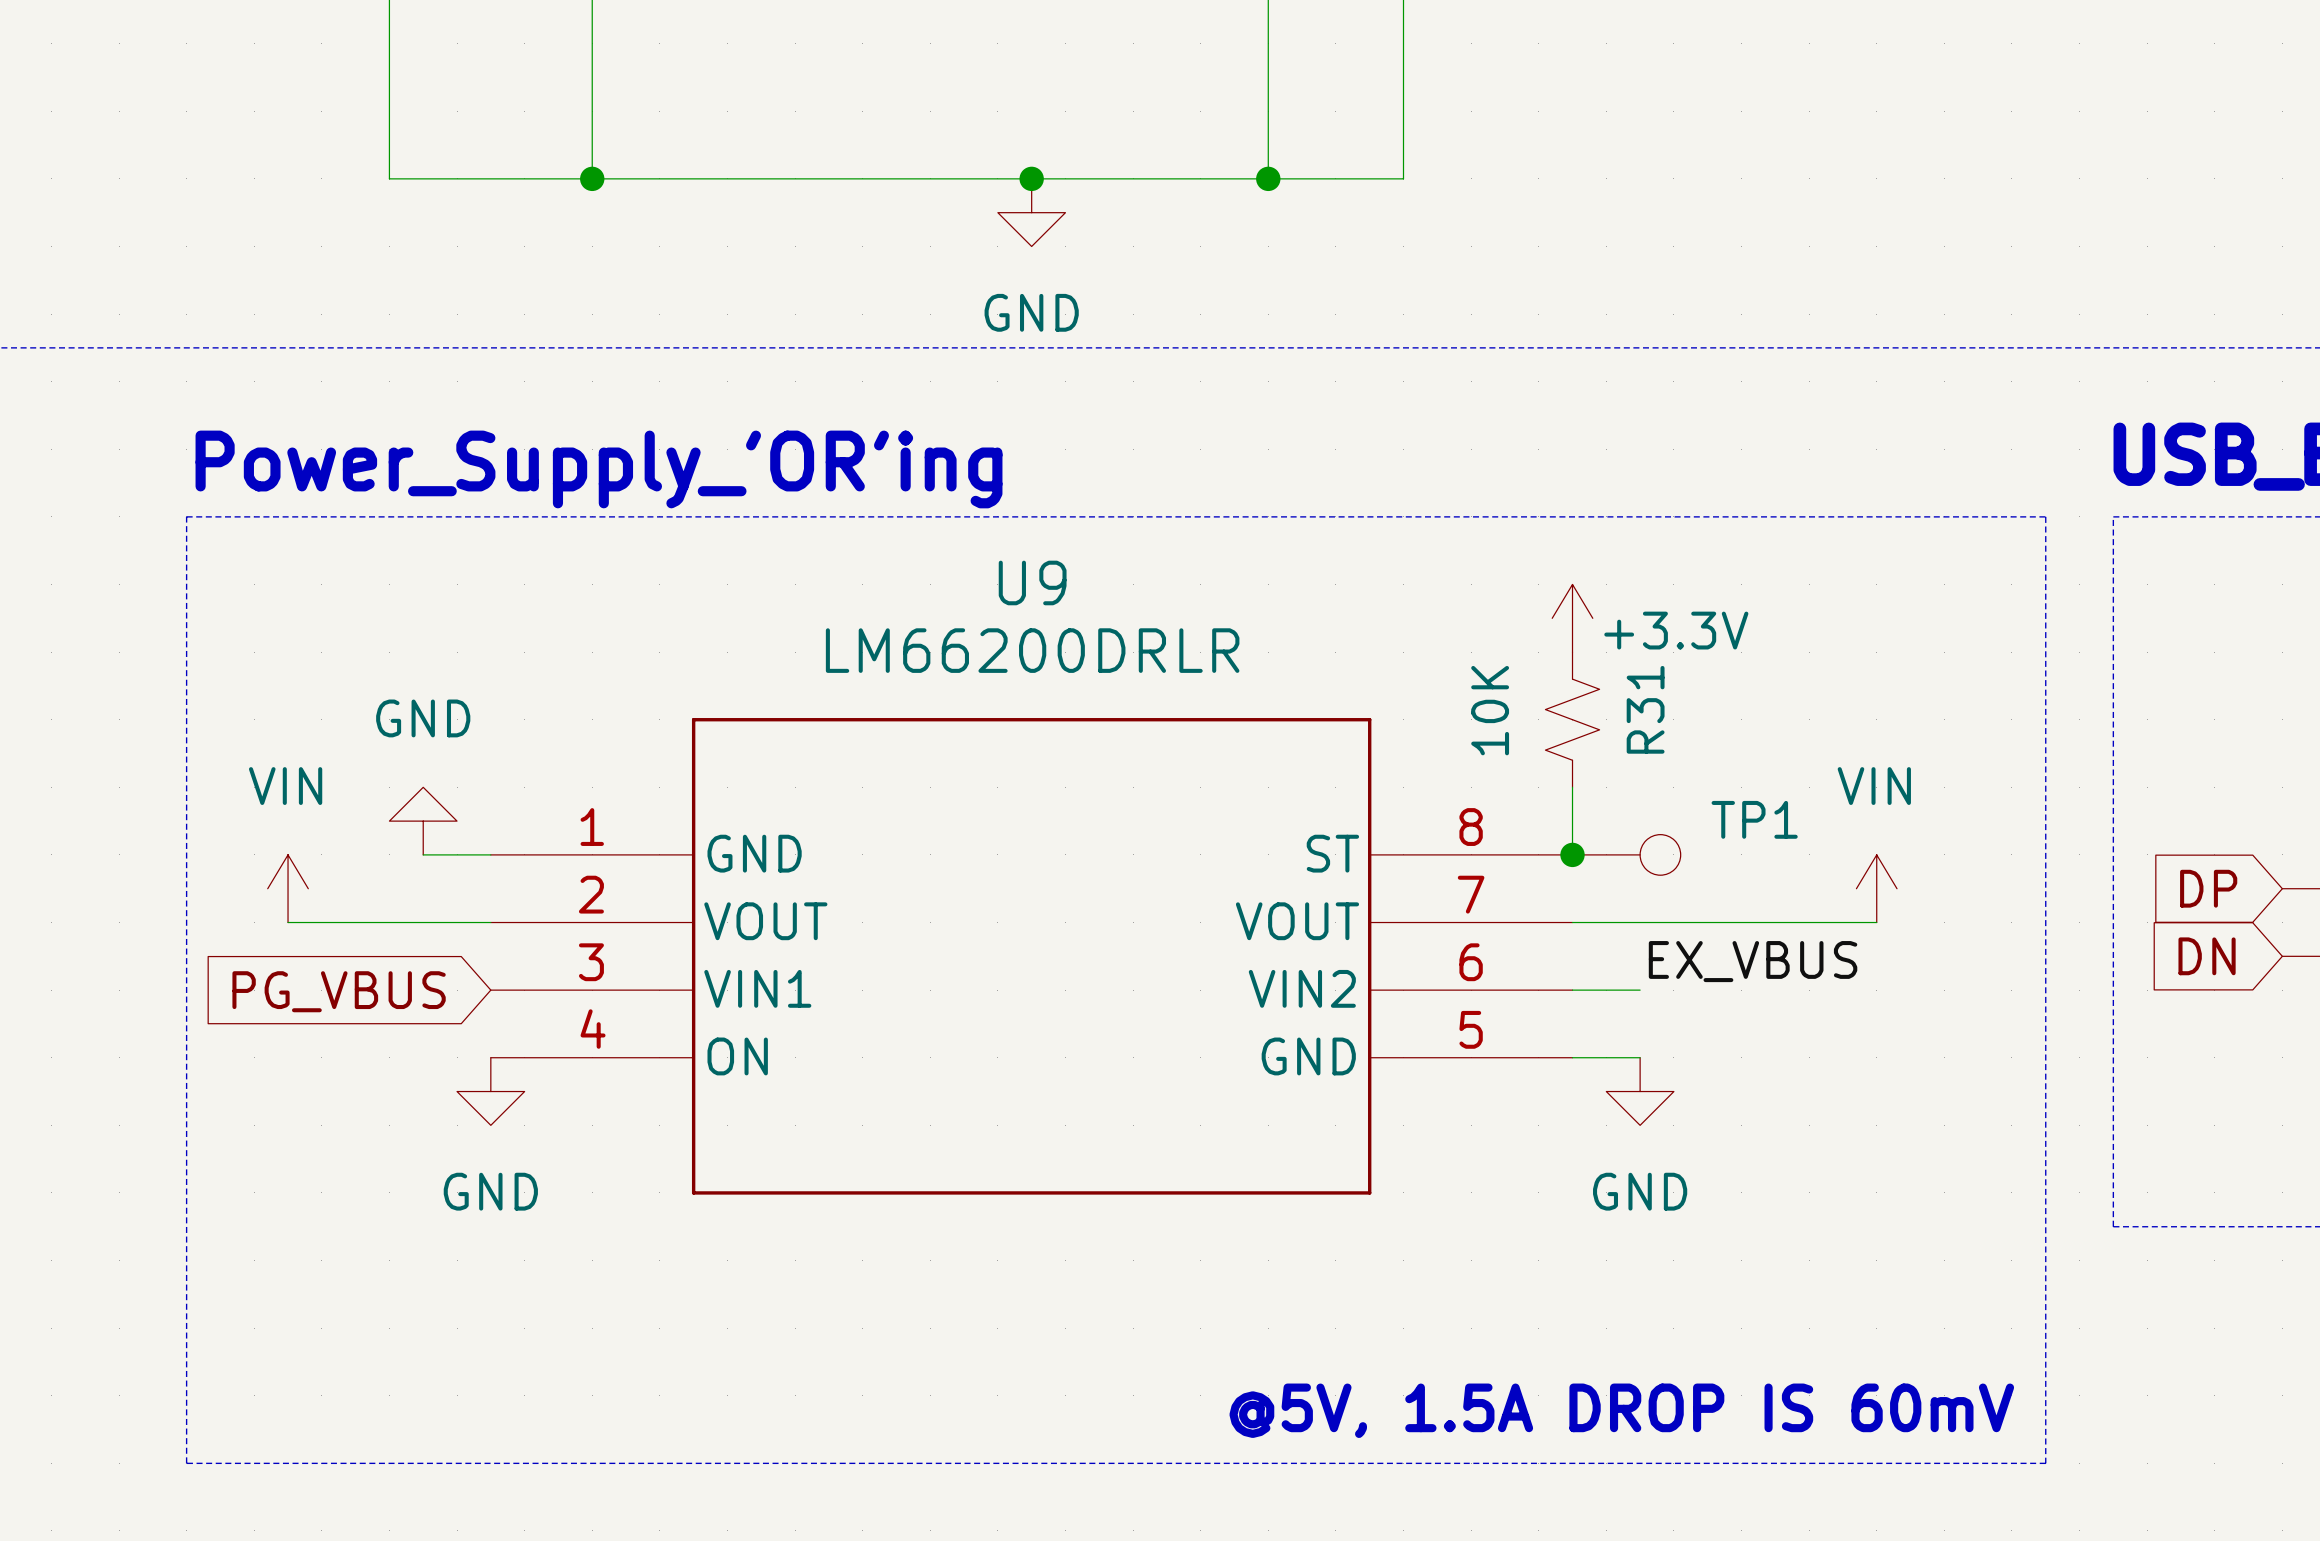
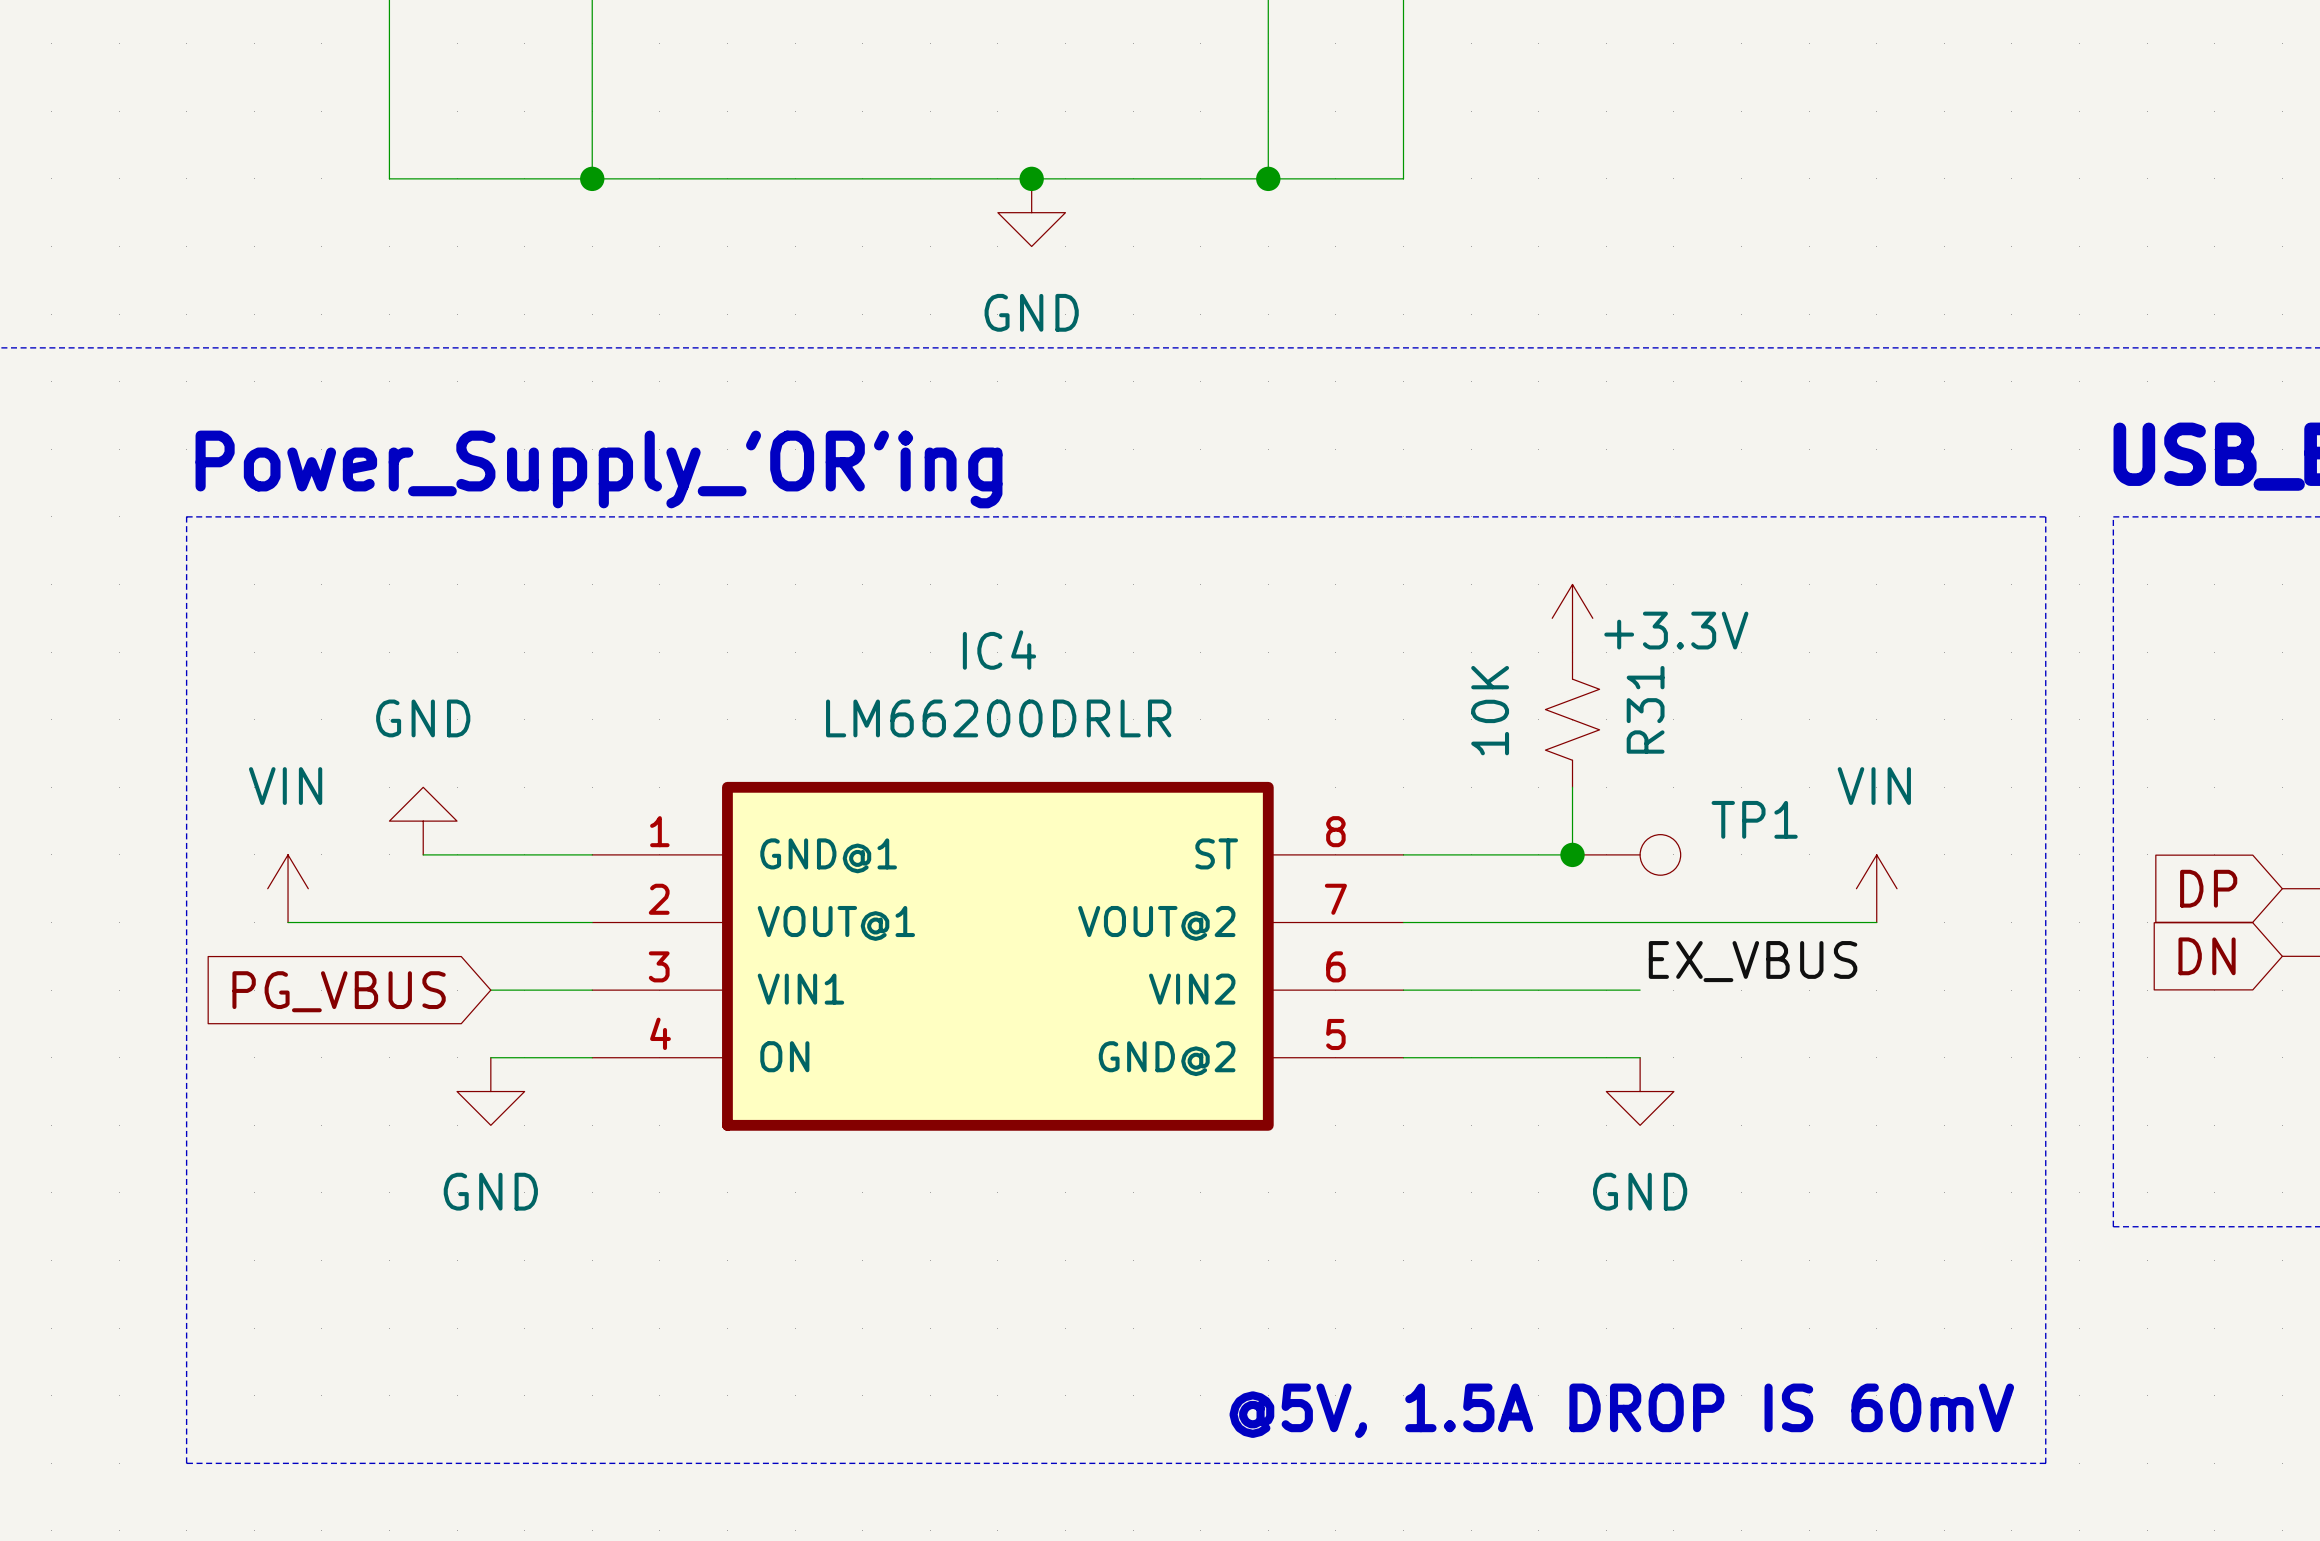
IC4: none -> LM66200DRLR (997, 956)
U9: LM66200DRLR (1031, 956) -> none

